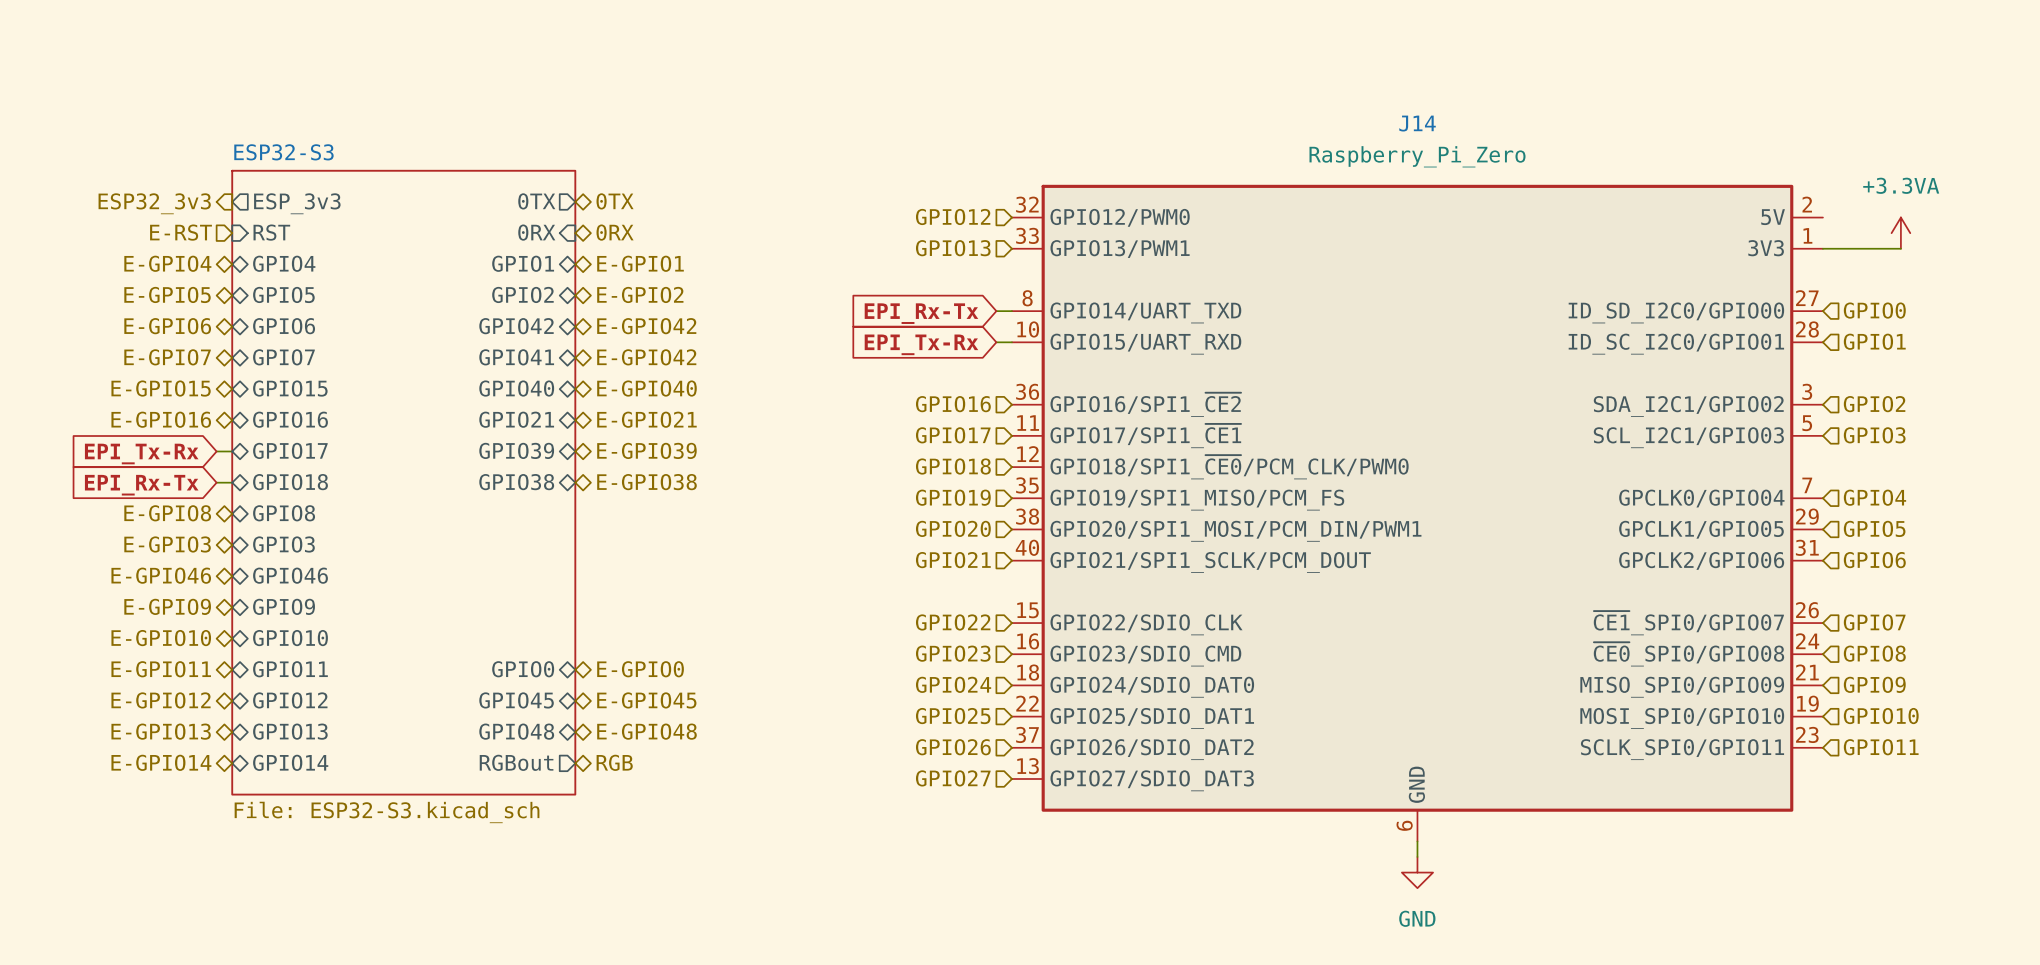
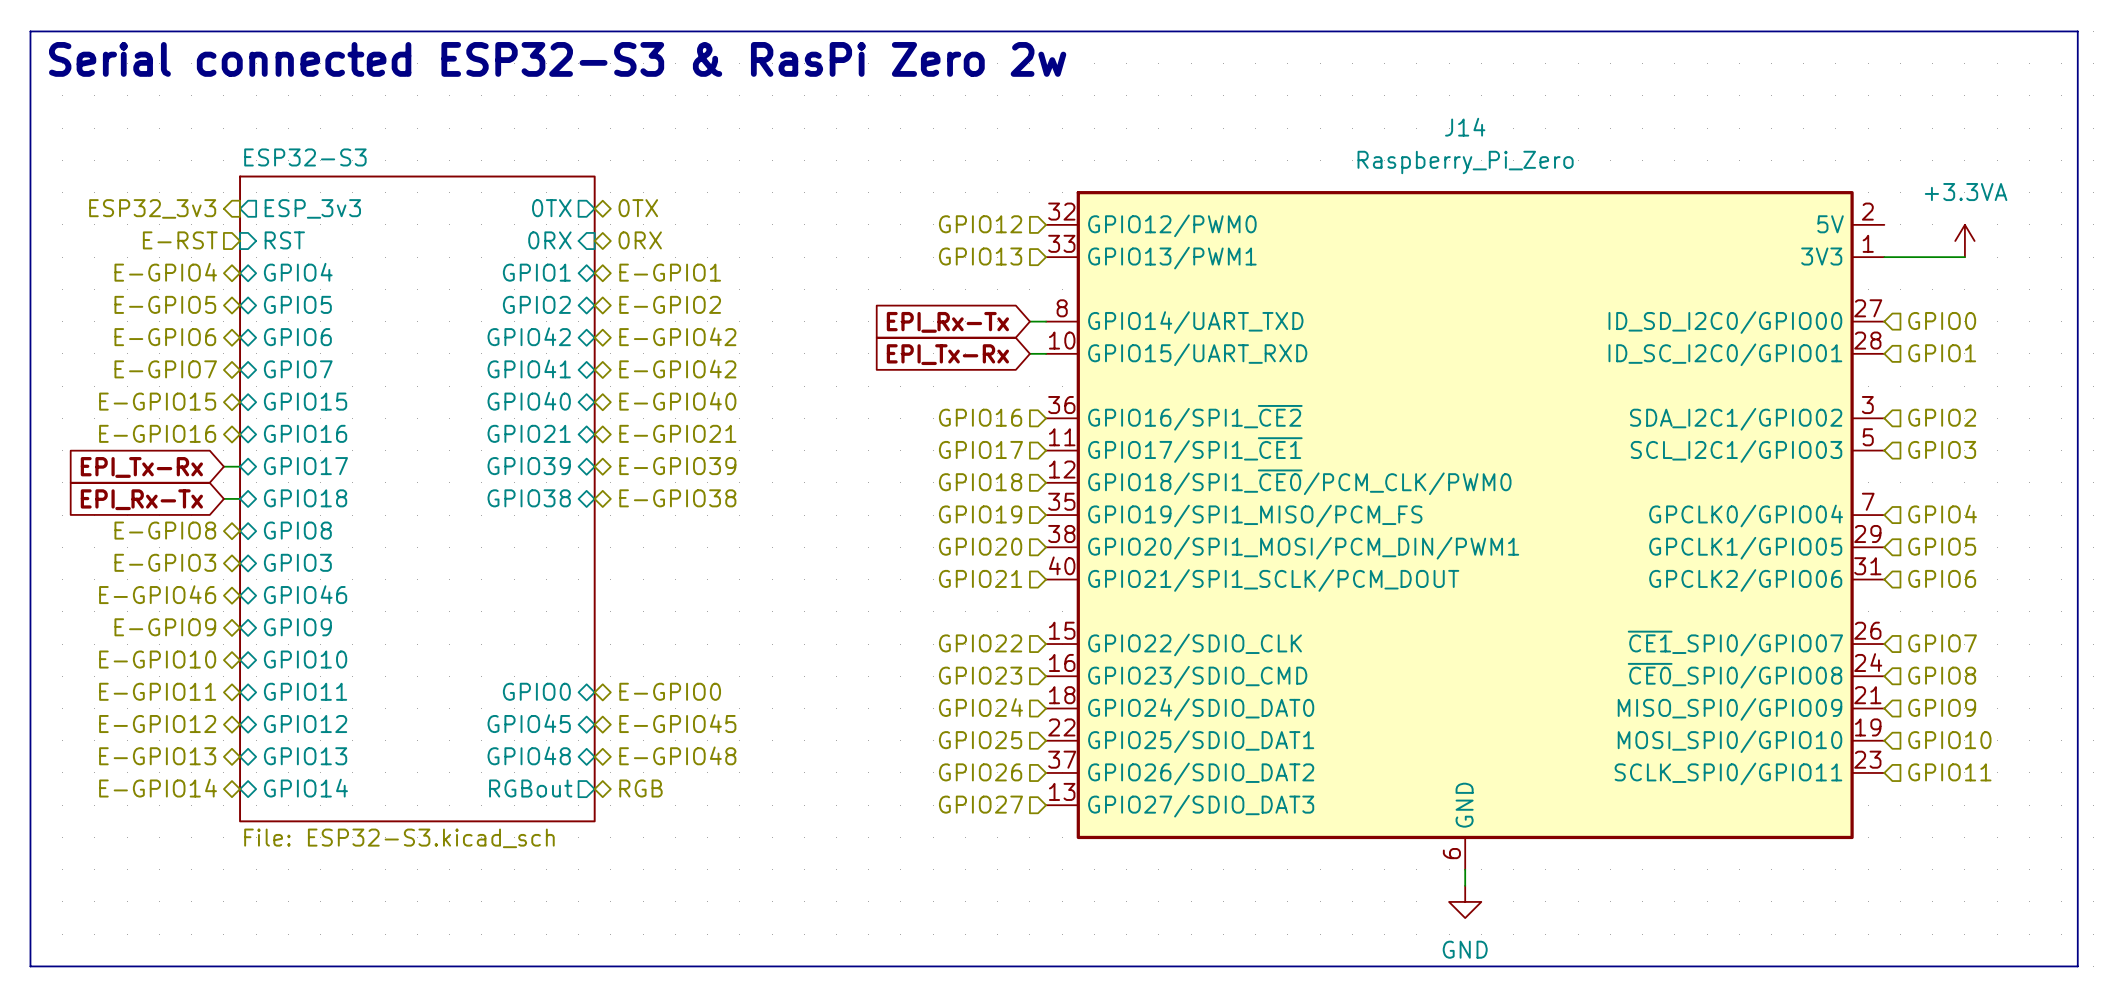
line: none -> (30, 31) (2077, 31) (2077, 966) (30, 966) (30, 31)
text: none -> Serial connected ESP32-S3 & RasPi Zero 2w (557, 59)

